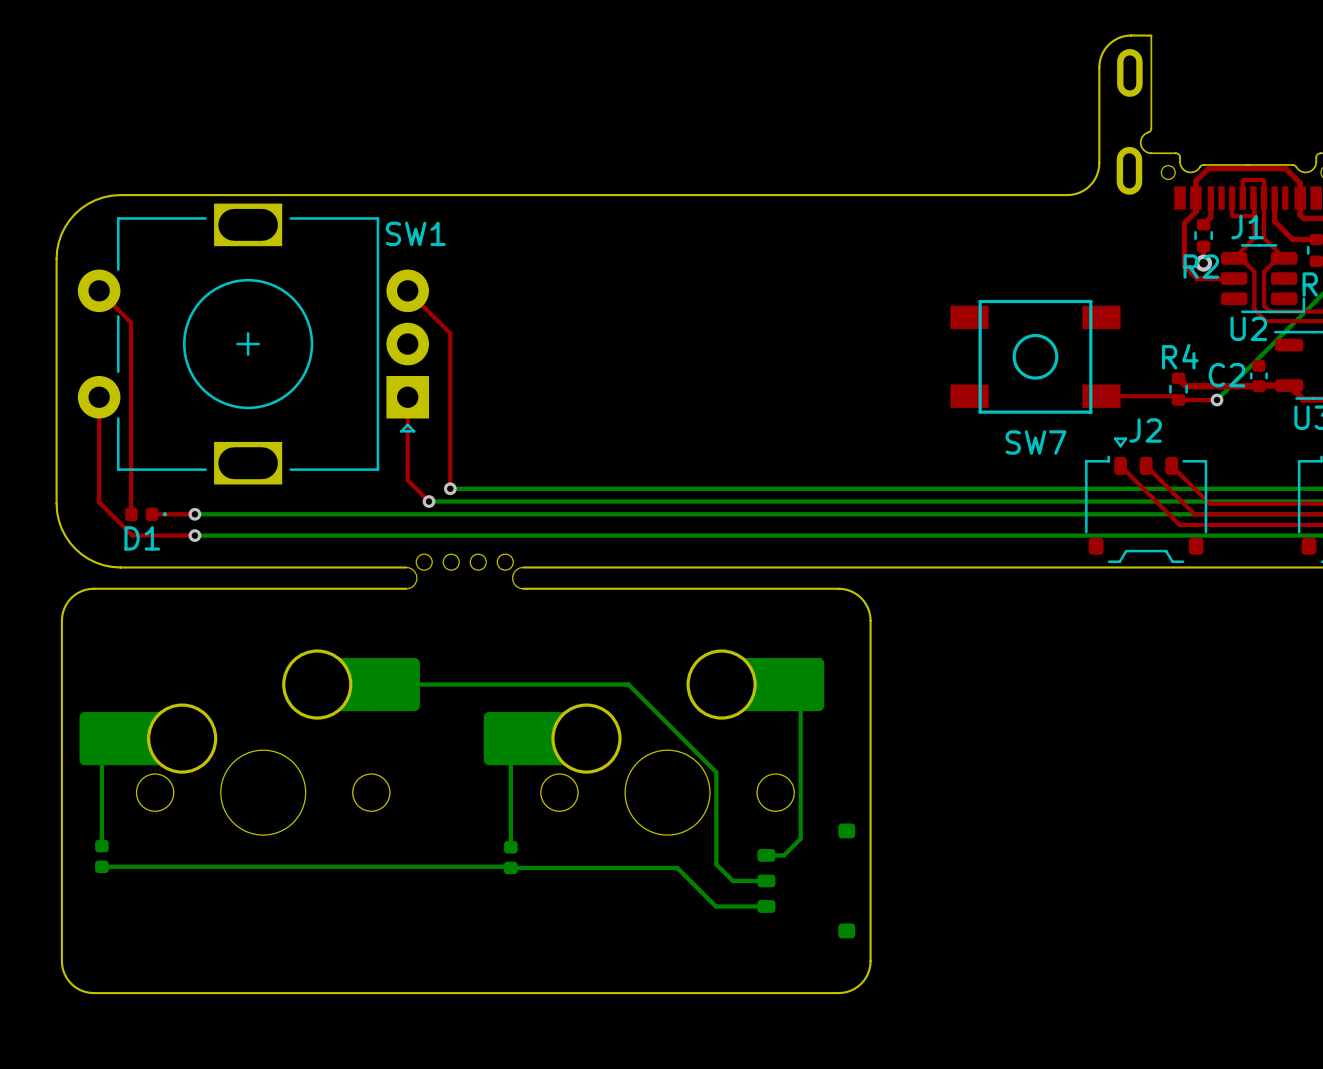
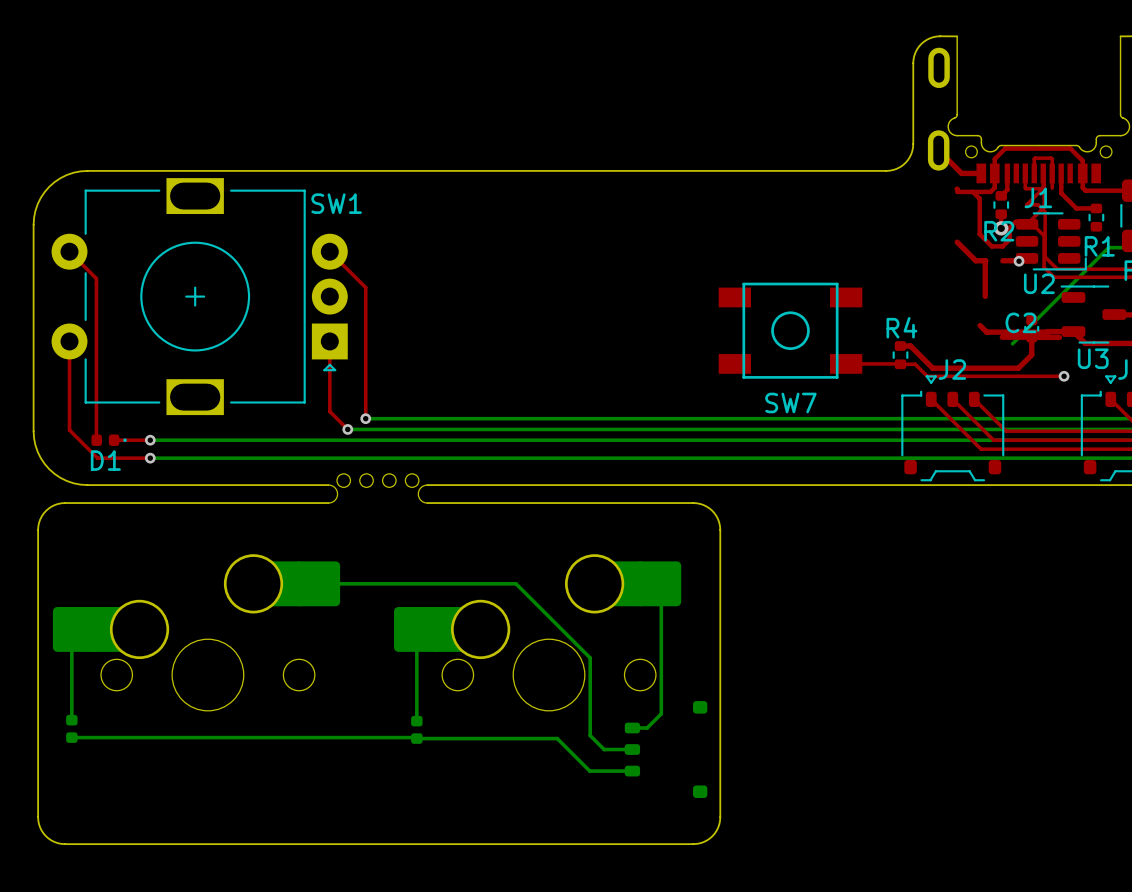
top track: none -> (938, 150) (961, 173) (981, 173)
top track: (1195, 211) (1184, 223) (1184, 265) (1197, 278) (1234, 278) -> (994, 184) (990, 191) (957, 191)
top track: (1264, 215) (1263, 238) (1284, 258) (1277, 258) (1263, 271) (1263, 305) -> (1043, 173) (1043, 188) (1026, 204) (1037, 204) (1045, 212) (1045, 257) (1052, 264)
top track: none -> (957, 189) (957, 189)
top track: none -> (972, 191) (979, 198) (979, 234) (991, 246) (1002, 246) (1009, 239) (1009, 227) (1015, 221) (1026, 221) (1019, 221)
top track: none -> (957, 242) (975, 260) (985, 260) (985, 296)
top track: none -> (1002, 260) (1019, 261)
via: none -> (1019, 261)
SW7 position: (1035, 356) -> (790, 330)
C2 position: (1258, 375) -> (1031, 328)
R4 position: (1178, 389) -> (900, 355)
top track: none -> (1002, 337) (1031, 337)
top track: none -> (1059, 337) (1031, 337) (1031, 354) (1018, 368) (932, 368) (910, 345) (900, 345)
top track: (1101, 396) (1174, 396) (1178, 400) -> none
top track: (1178, 400) (1217, 400) -> none
via: (1217, 400) -> none
top track: none -> (846, 363) (915, 364) (927, 376) (1064, 376)
via: none -> (1064, 376)

